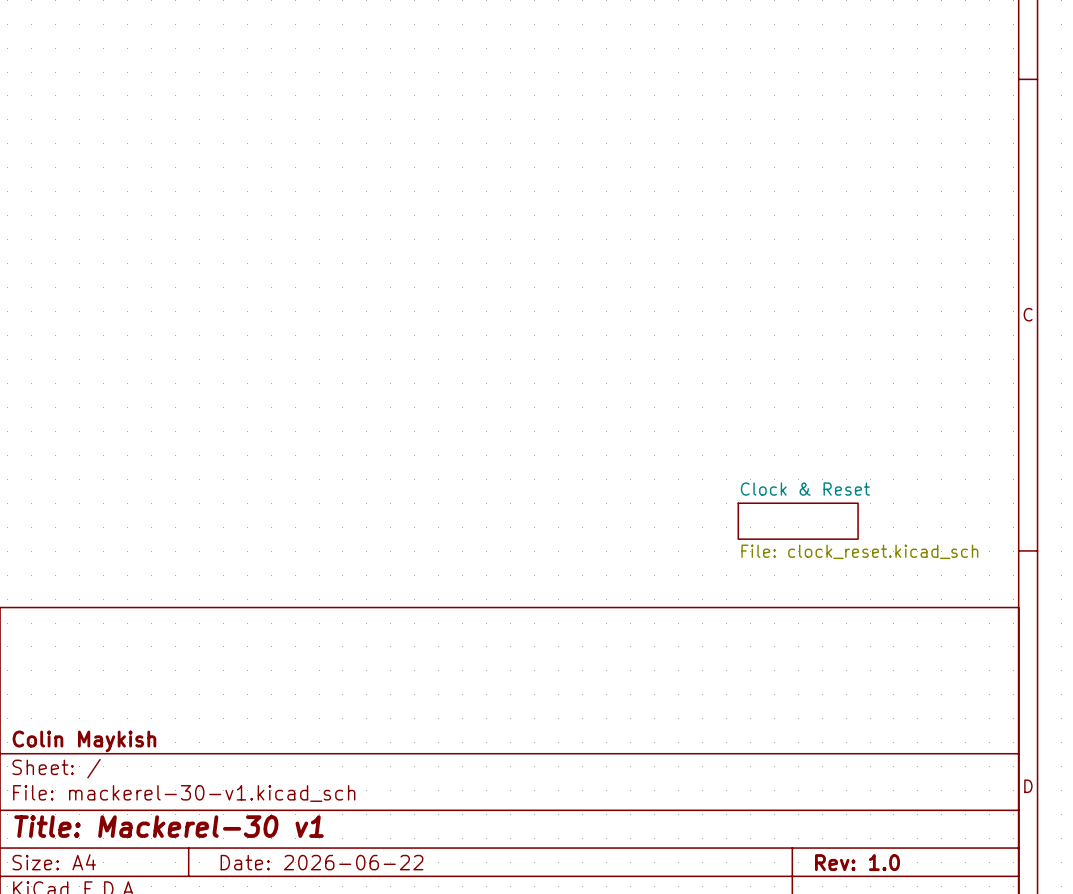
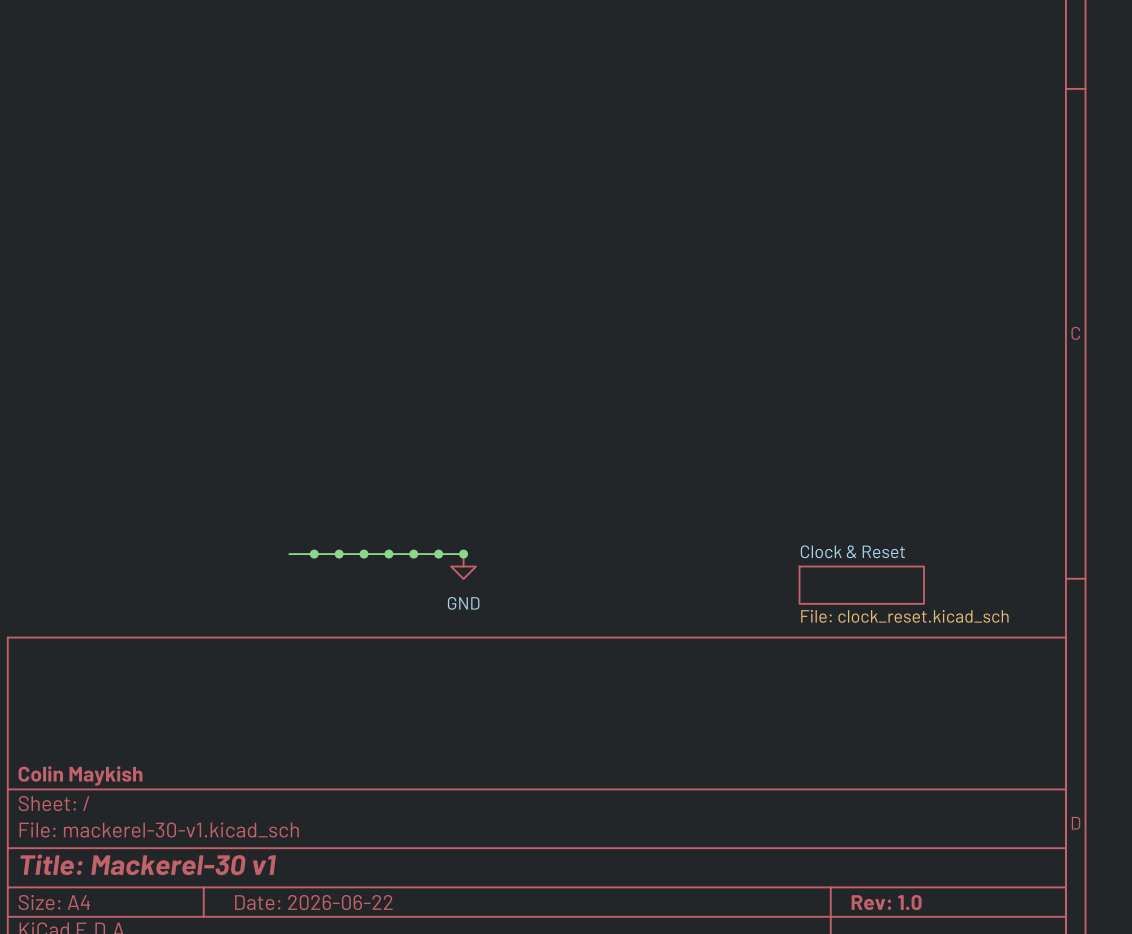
sheet Clock & Reset position: (798, 521) -> (861, 585)
wire: none -> (289, 554) (463, 554)
junction: none -> (314, 554)
junction: none -> (339, 554)
junction: none -> (364, 554)
junction: none -> (388, 554)
junction: none -> (413, 554)
junction: none -> (438, 554)
junction: none -> (463, 554)
power symbol: none -> GND (463, 566)

